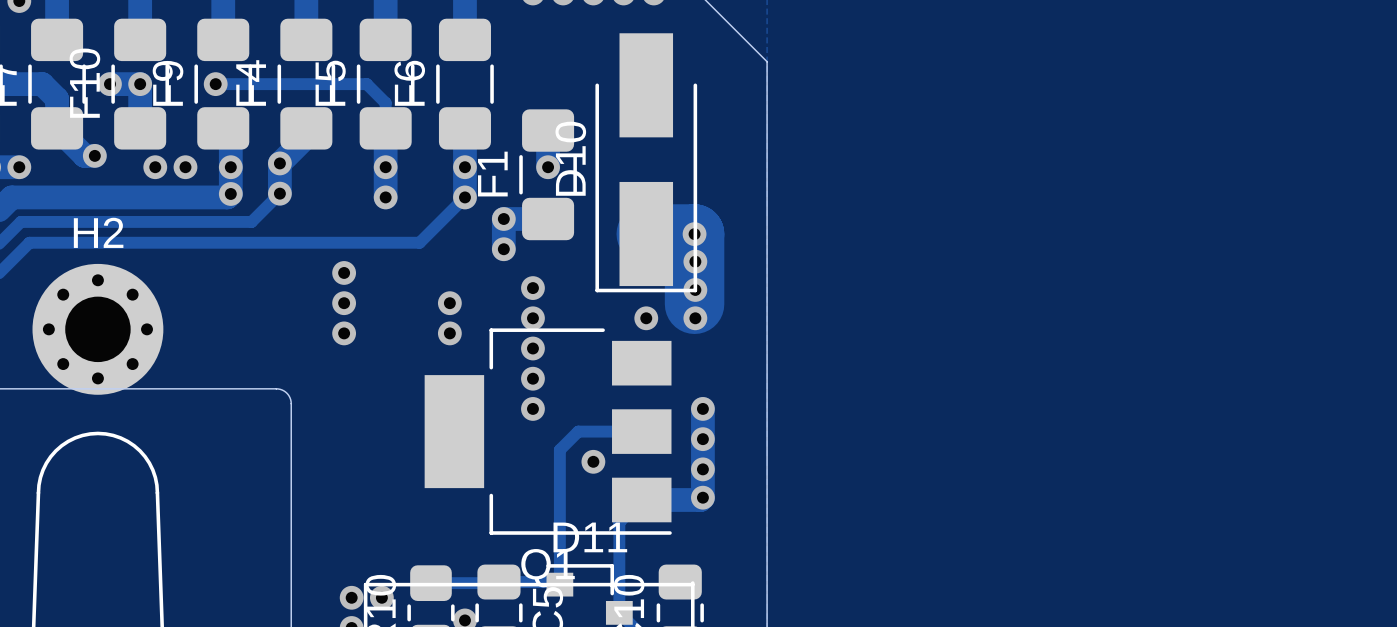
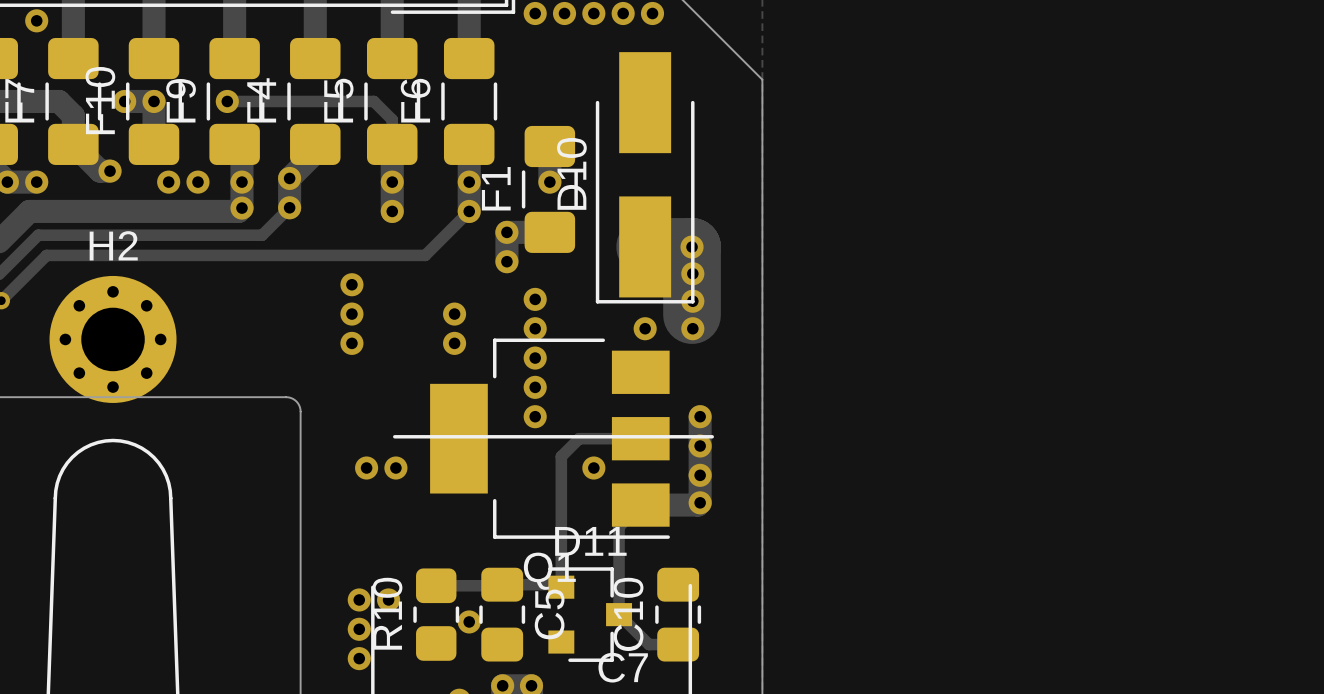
via: none -> (366, 468)
via: none -> (395, 468)
line: (365, 584) (692, 584) -> (394, 436) (712, 436)

